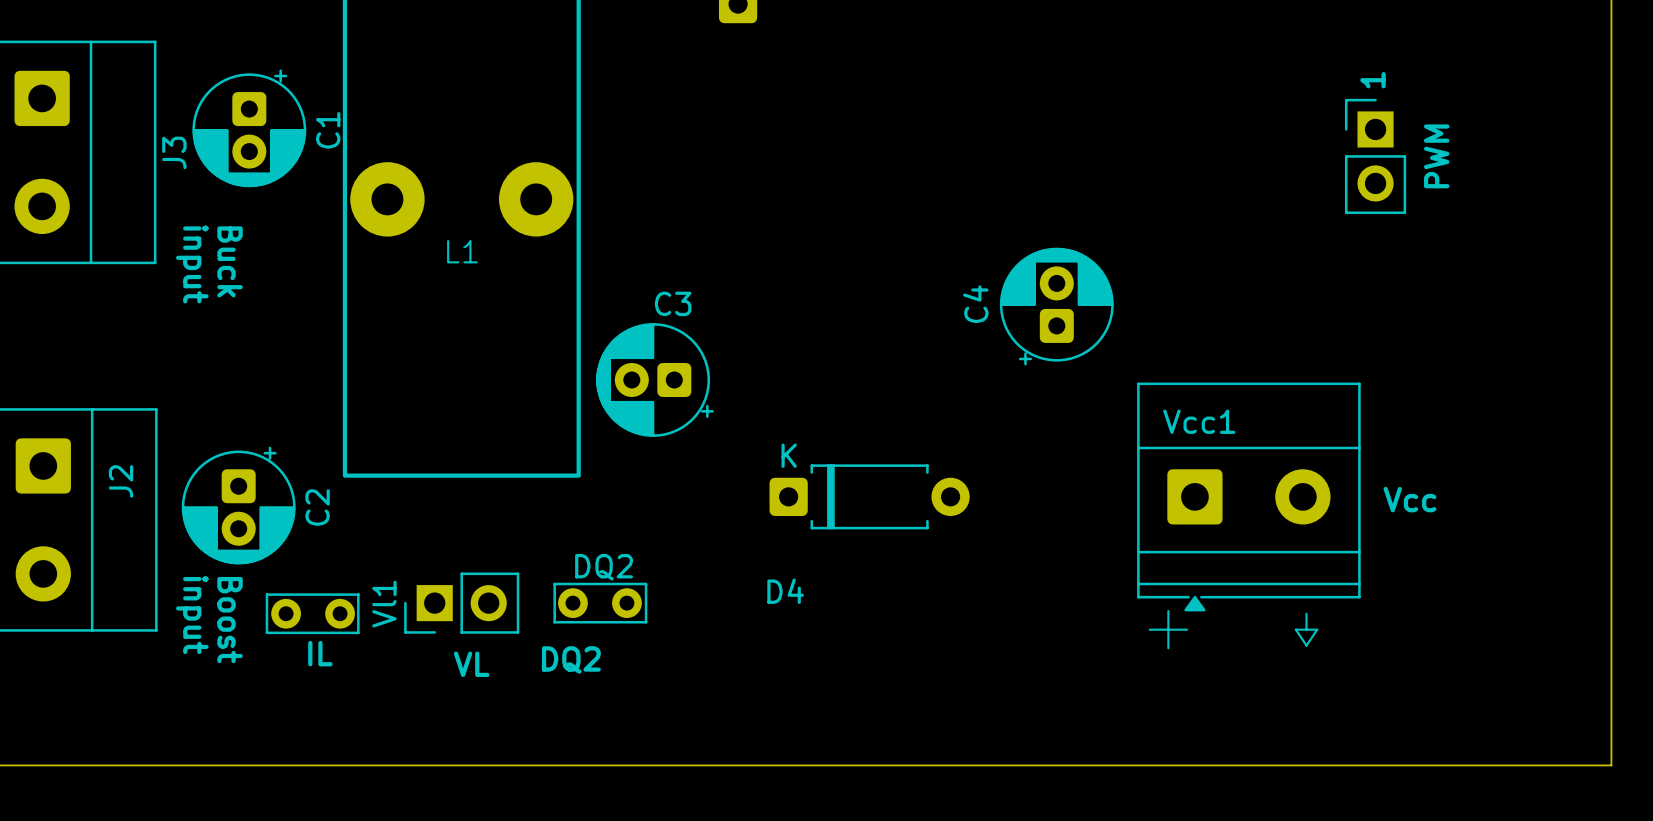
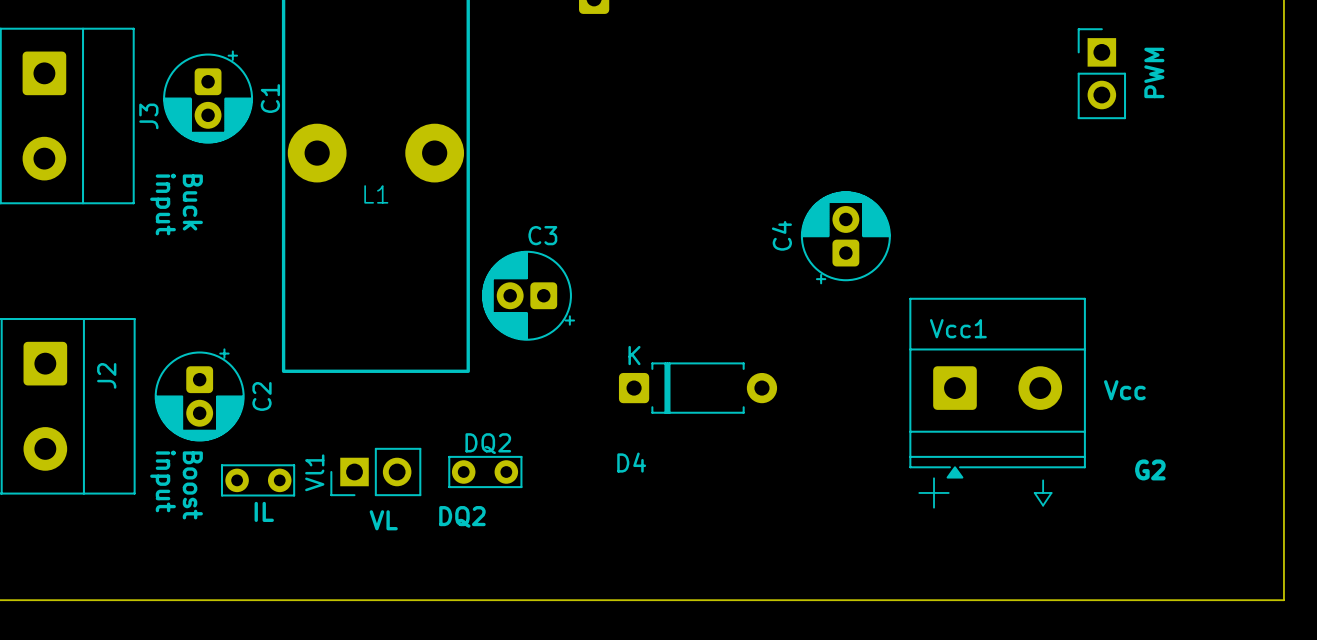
text: 1 (1372, 80) -> none
part position: (1375, 156) -> (1101, 73)
text position: PWM (1436, 156) -> PWM (1154, 72)
text: none -> G2 (1150, 469)

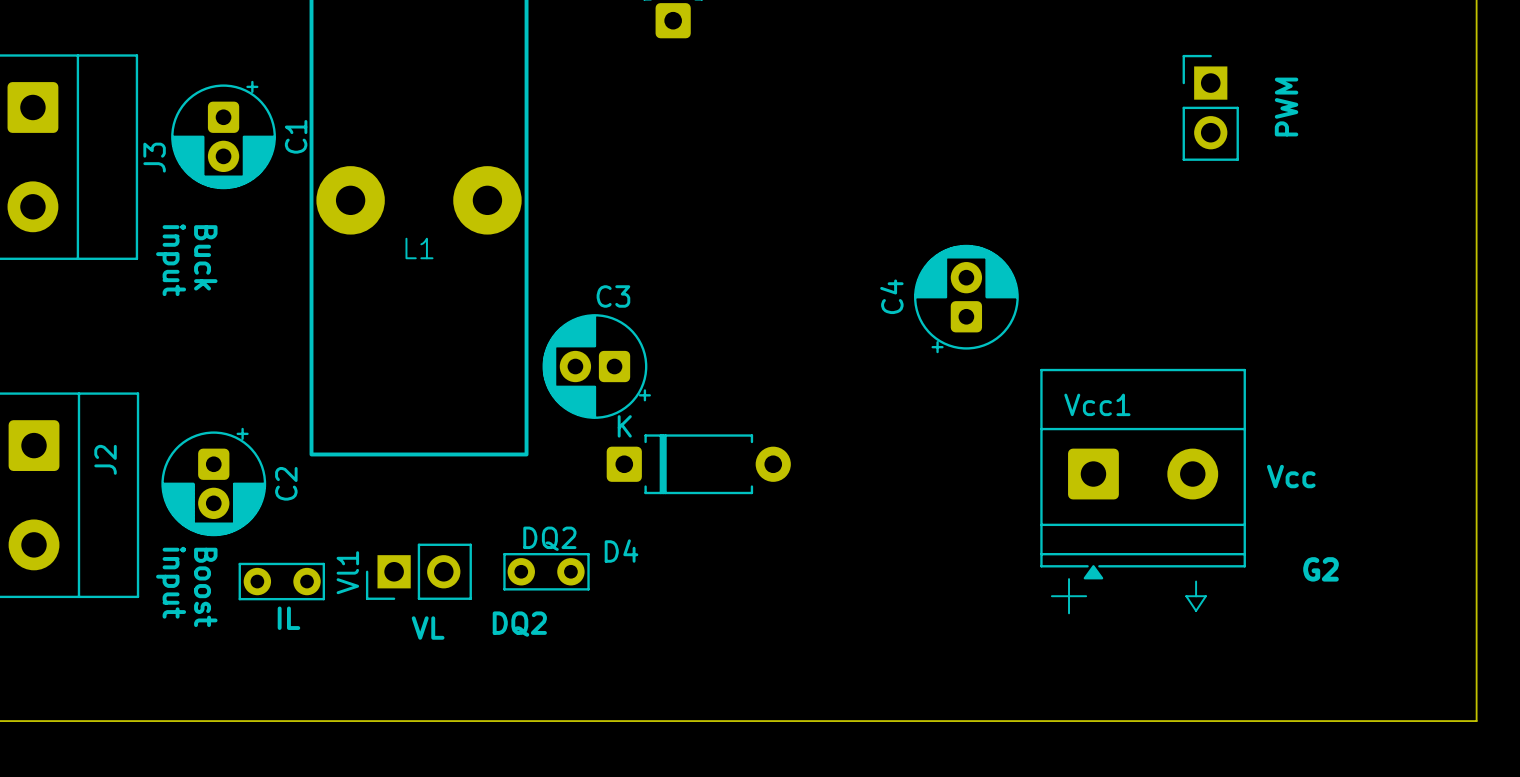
text position: PWM (1154, 72) -> PWM (1286, 107)
part position: (1101, 73) -> (1210, 107)
D4 position: (698, 388) -> (698, 464)

